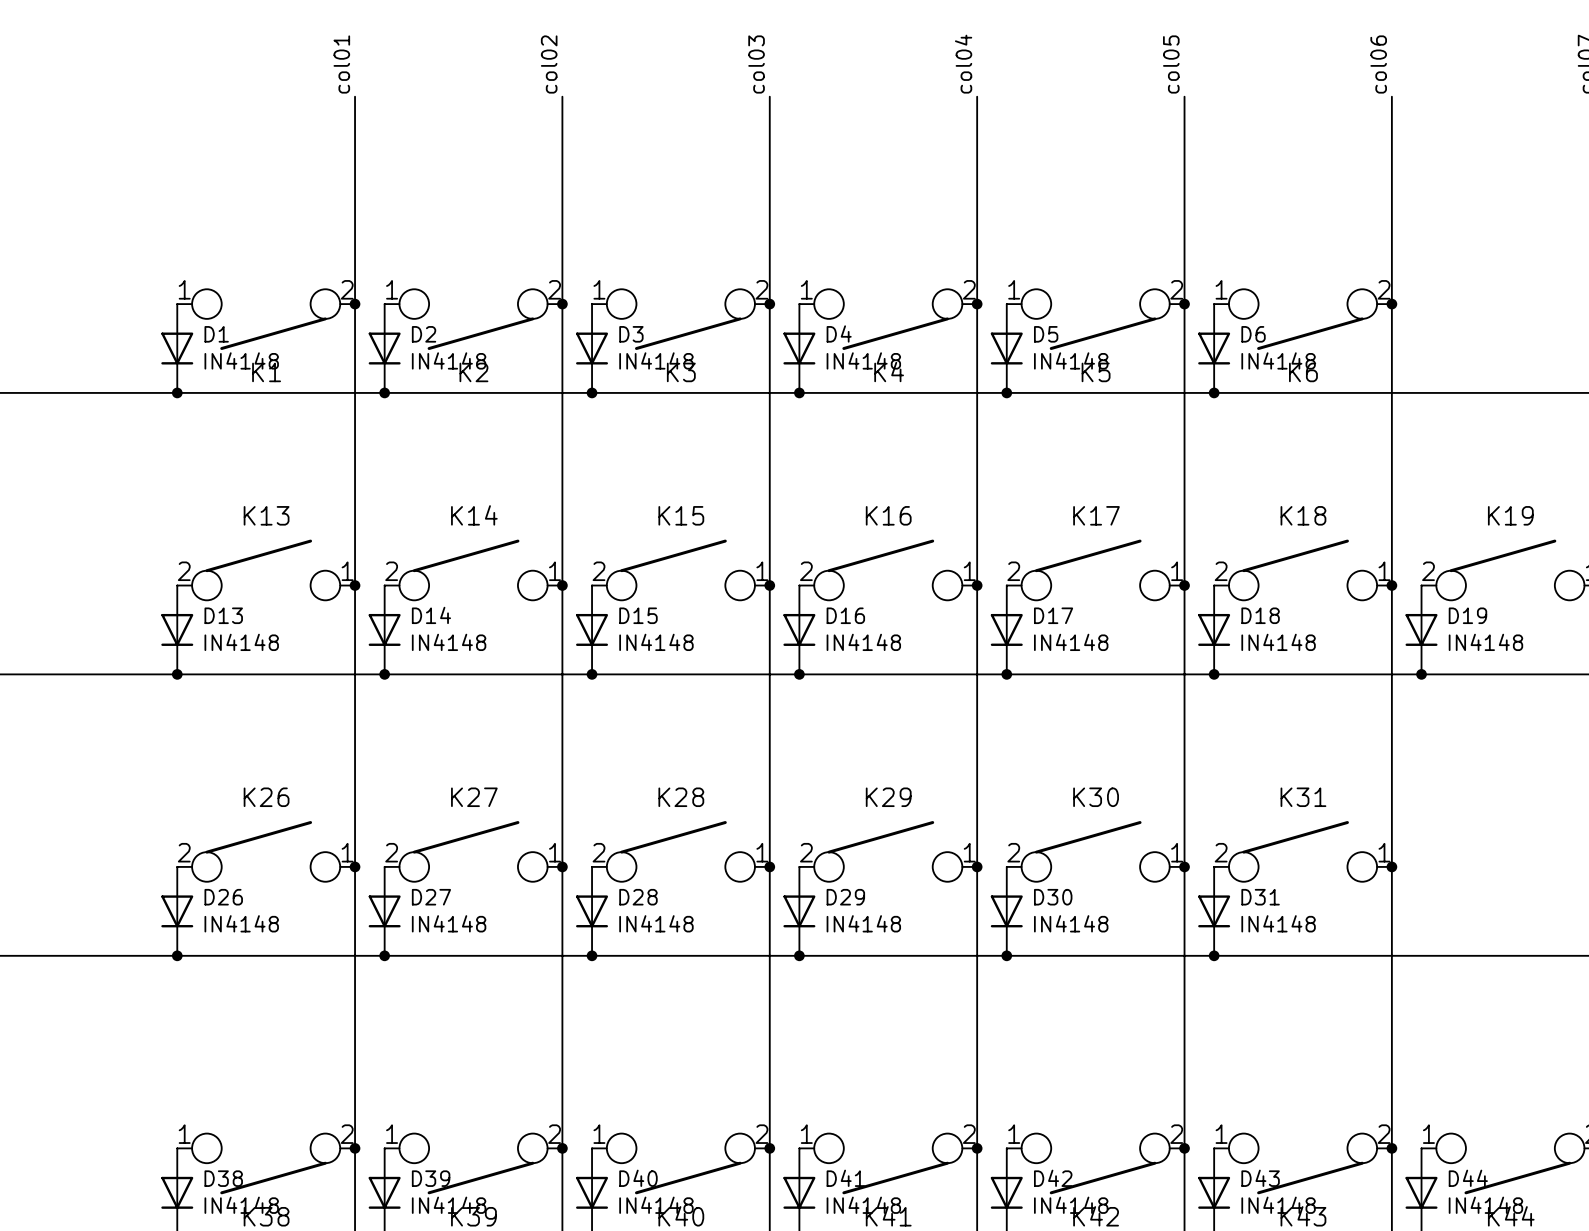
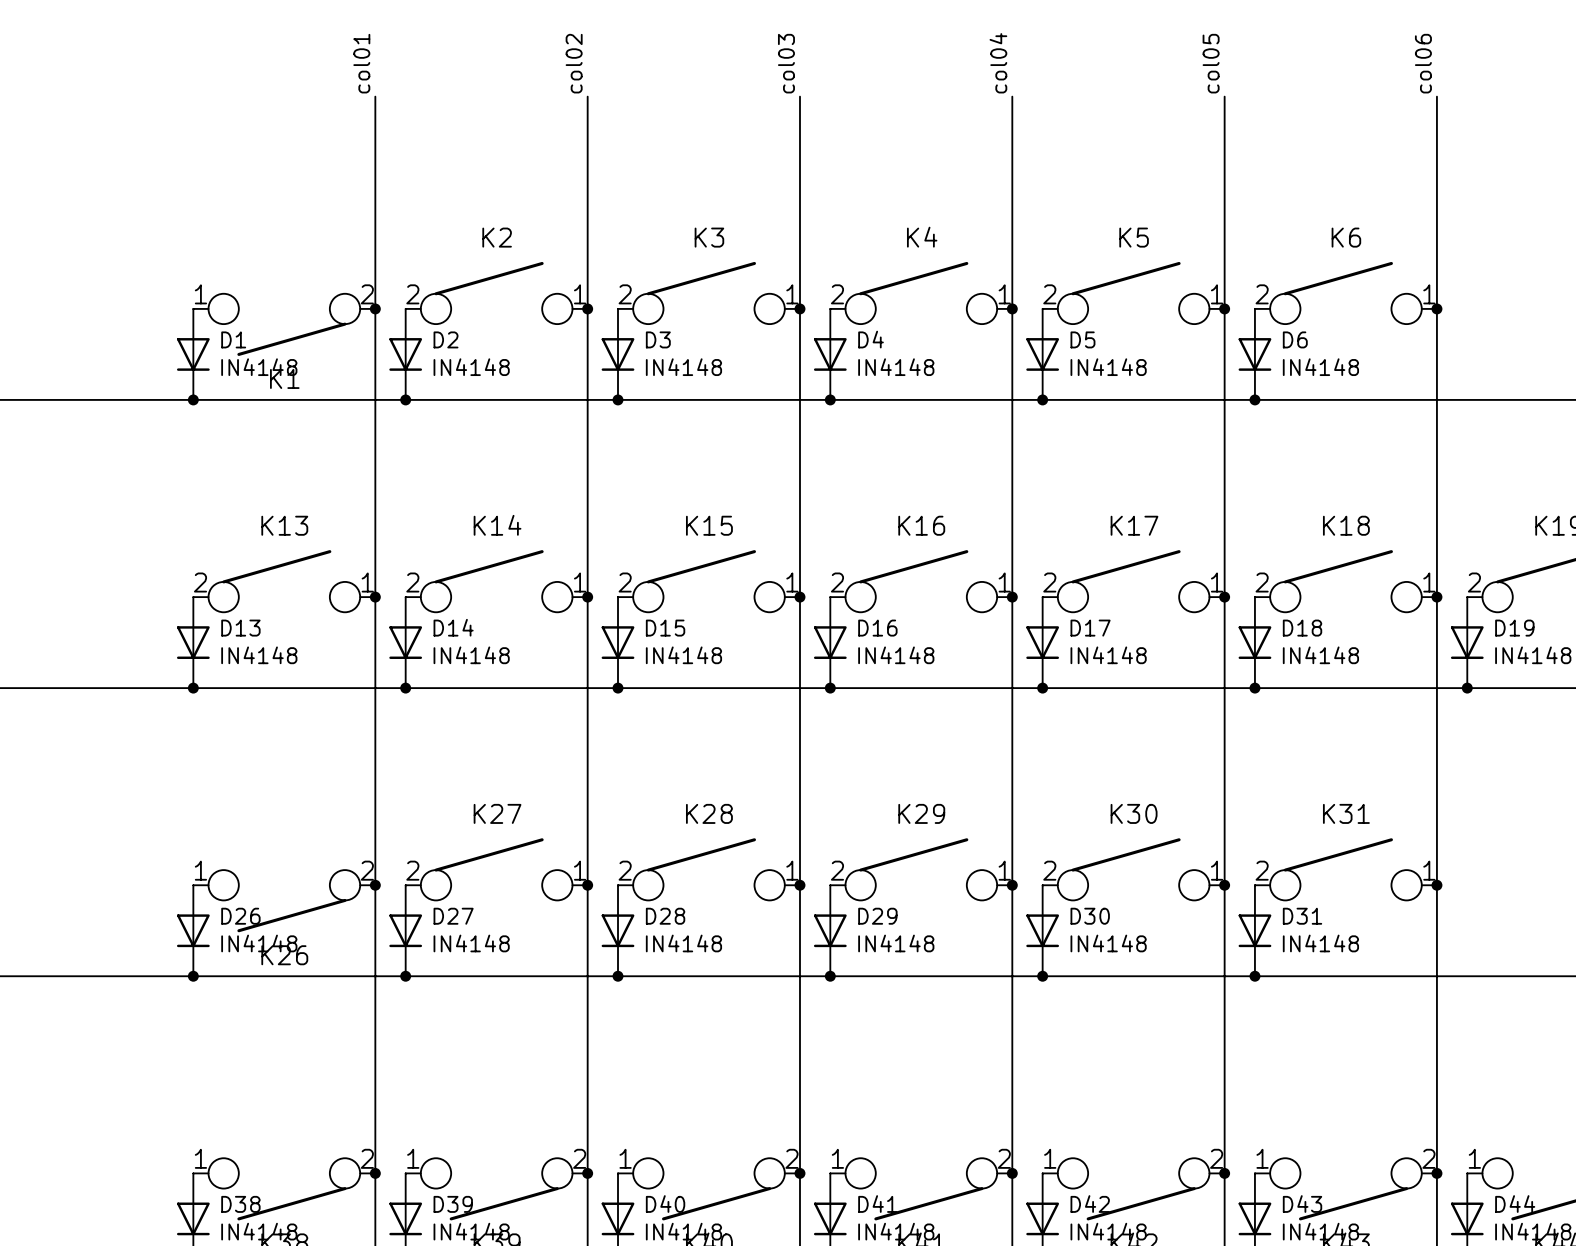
K2 rotation: 0° (473, 319) -> 180° (496, 293)
K3 rotation: 0° (680, 319) -> 180° (708, 293)
K4 rotation: 0° (888, 319) -> 180° (921, 293)
K5 rotation: 0° (1095, 319) -> 180° (1133, 293)
K6 rotation: 0° (1303, 319) -> 180° (1345, 293)
K26 rotation: 0° (266, 851) -> 180° (284, 901)

